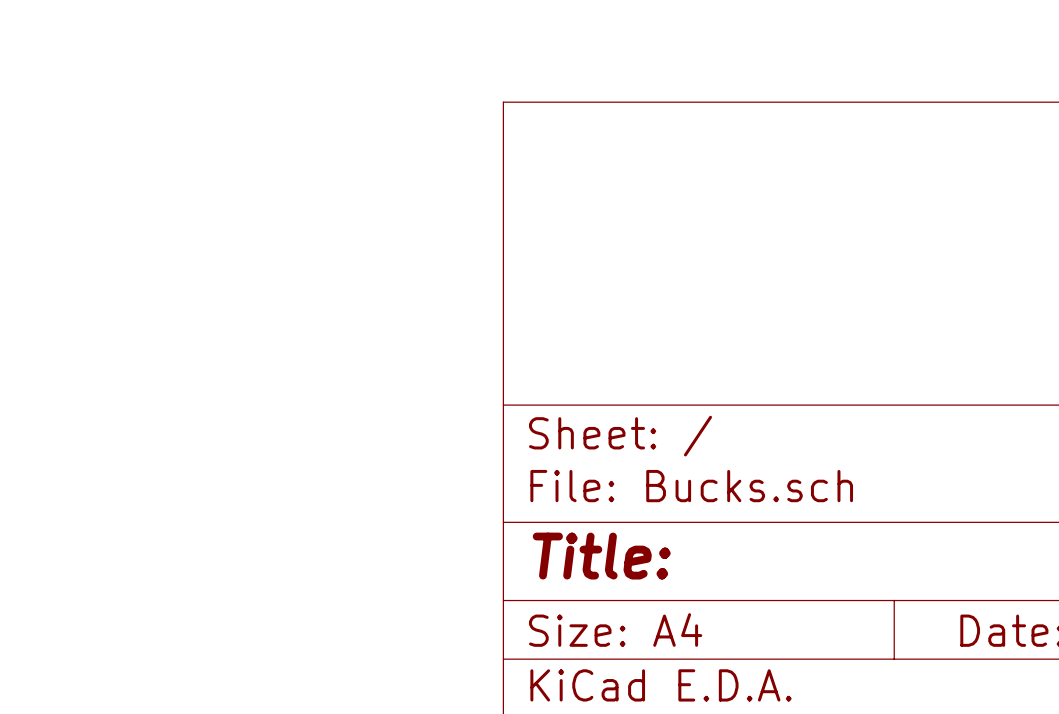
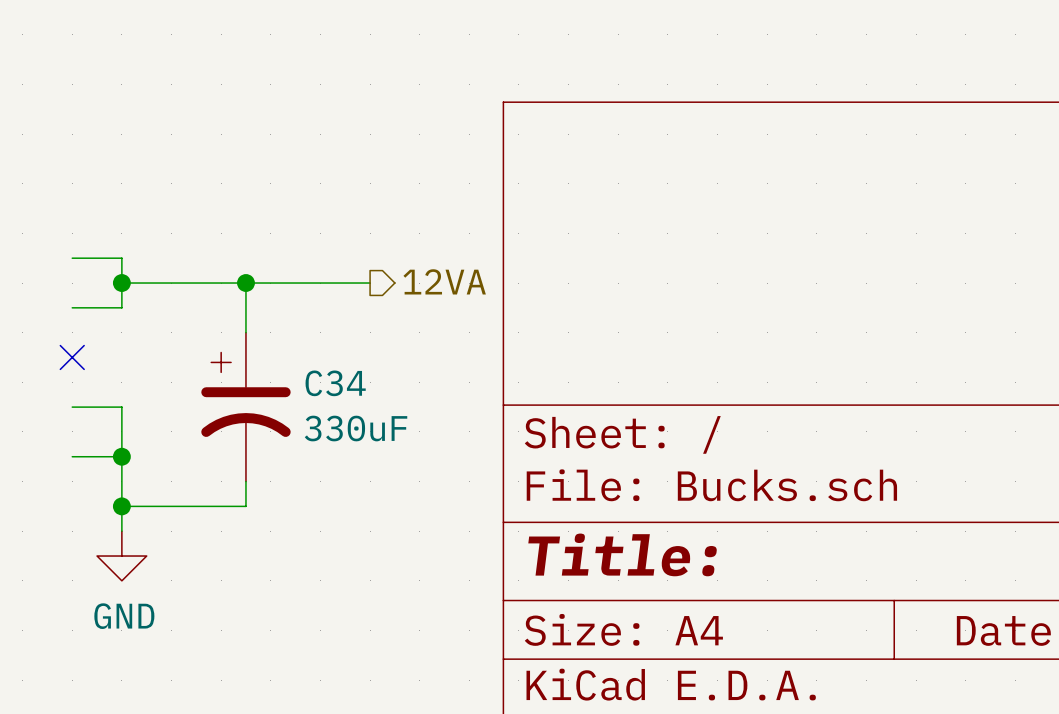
wire: none -> (72, 258) (121, 258) (121, 307) (72, 307)
hierarchical label: none -> 12VA (444, 281)
wire: none -> (121, 283) (370, 283)
junction: none -> (121, 283)
wire: none -> (245, 283) (245, 332)
junction: none -> (245, 283)
no-connect mark: none -> (72, 357)
wire: none -> (72, 407) (121, 407) (121, 531)
C34: none -> 330uF (245, 407)
wire: none -> (72, 456) (121, 456)
junction: none -> (121, 456)
wire: none -> (245, 481) (245, 506) (121, 506)
junction: none -> (121, 506)
power symbol: none -> GND (121, 556)

